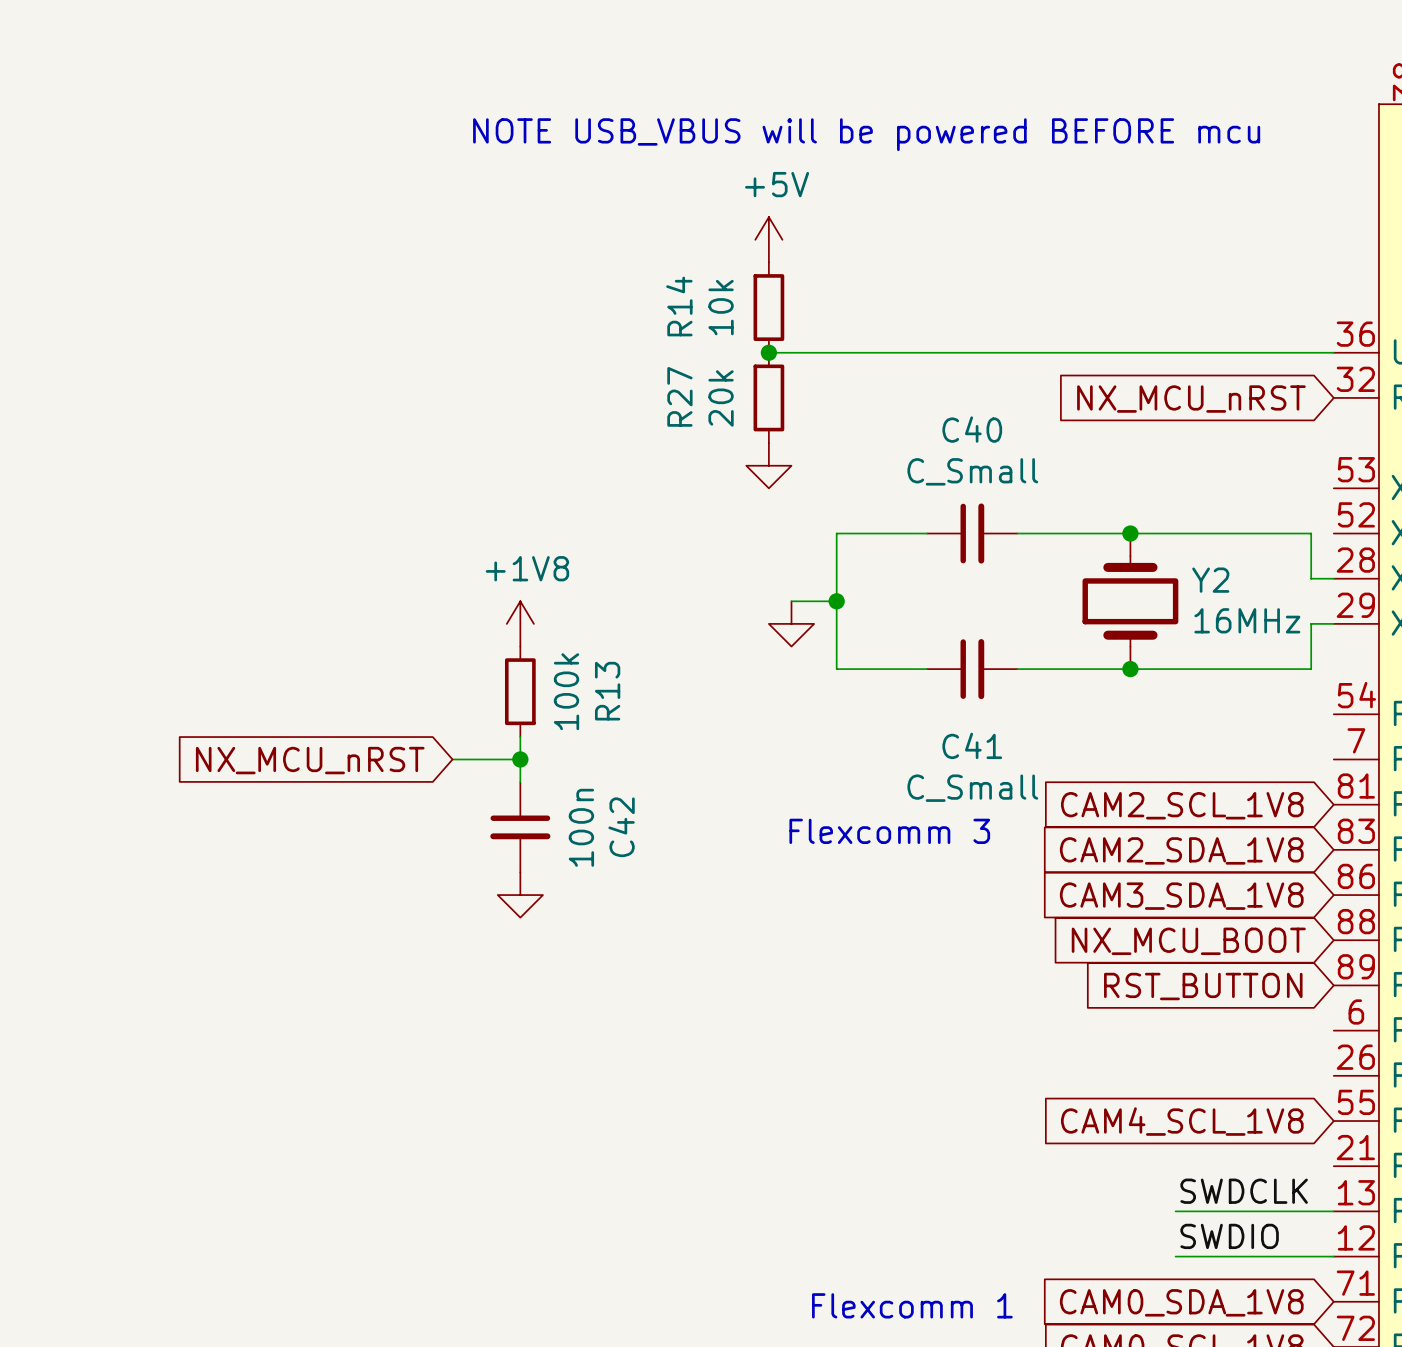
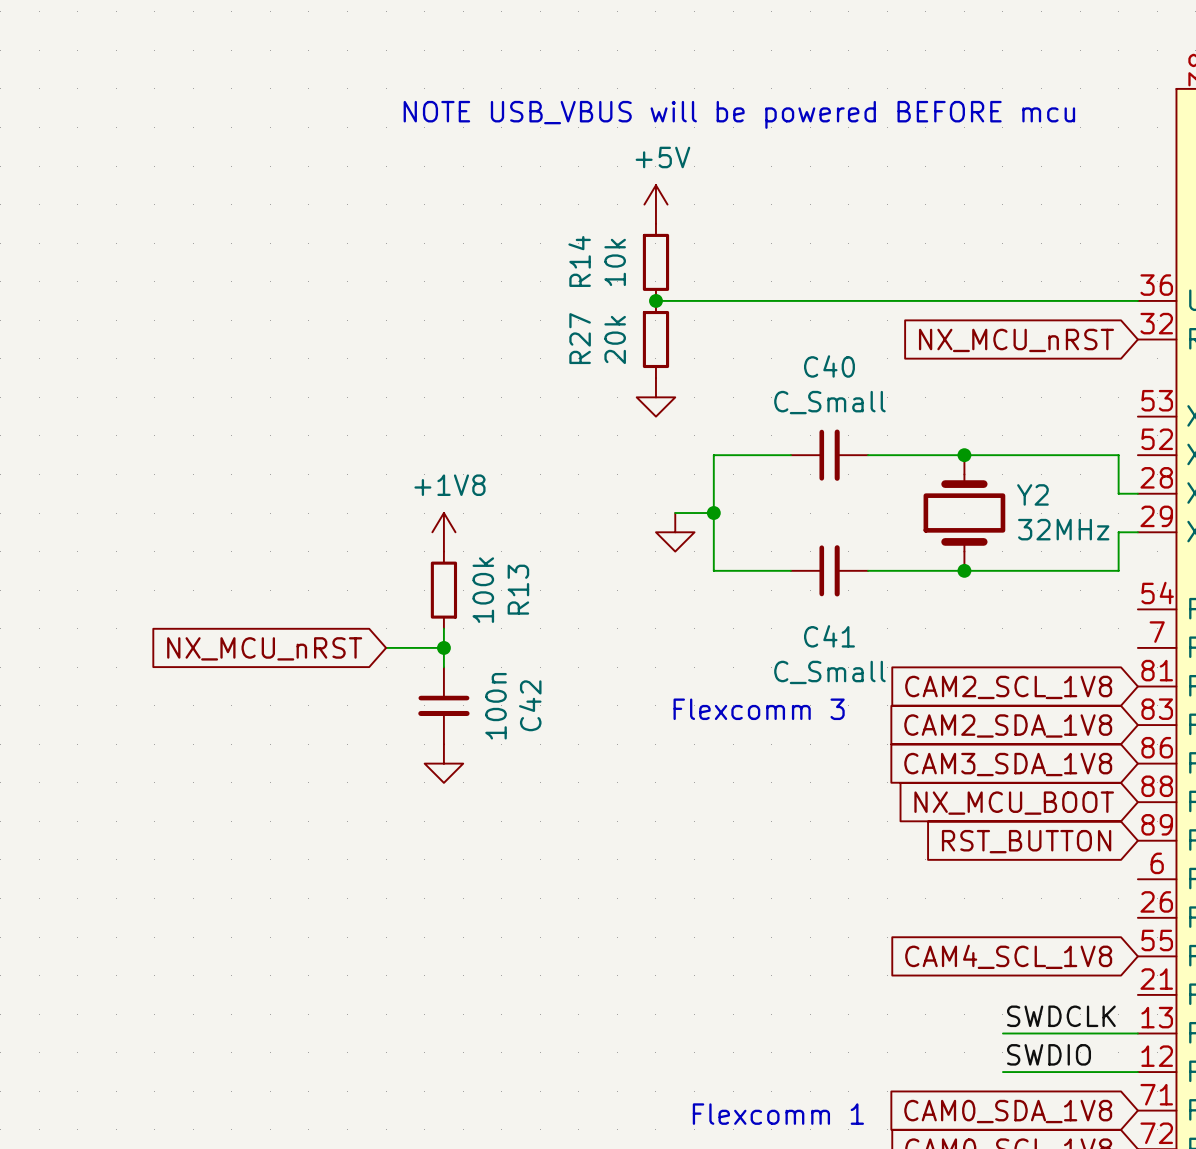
Y2 value: 16MHz (1247, 620) -> 32MHz (1063, 529)

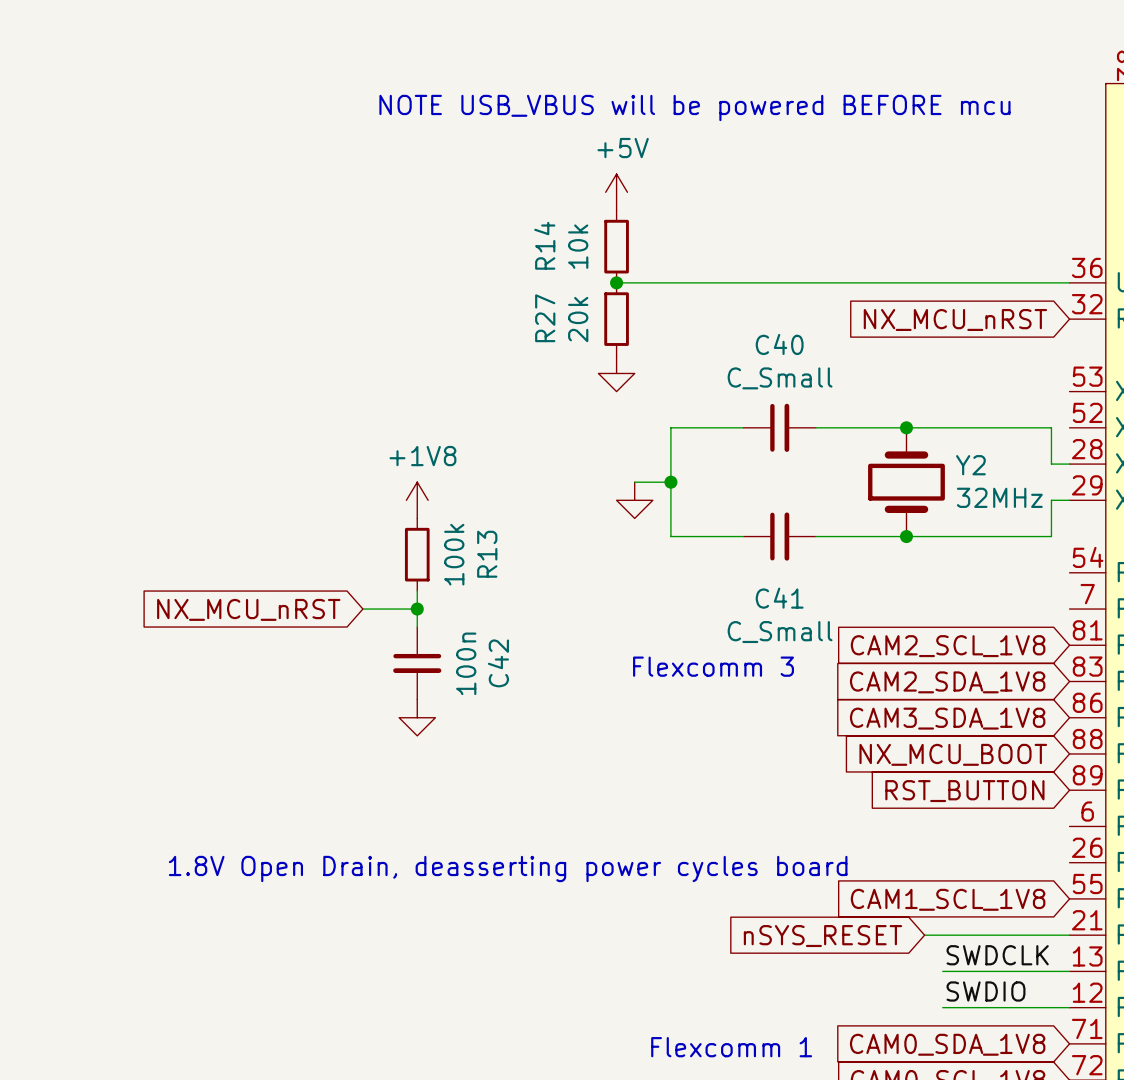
text: none -> 1.8V Open Drain, deasserting power cycles board (508, 868)
global label: CAM4_SCL_1V8 (1008, 956) -> CAM1_SCL_1V8 (948, 899)
wire: none -> (924, 935) (1069, 935)
global label: none -> nSYS_RESET (822, 936)

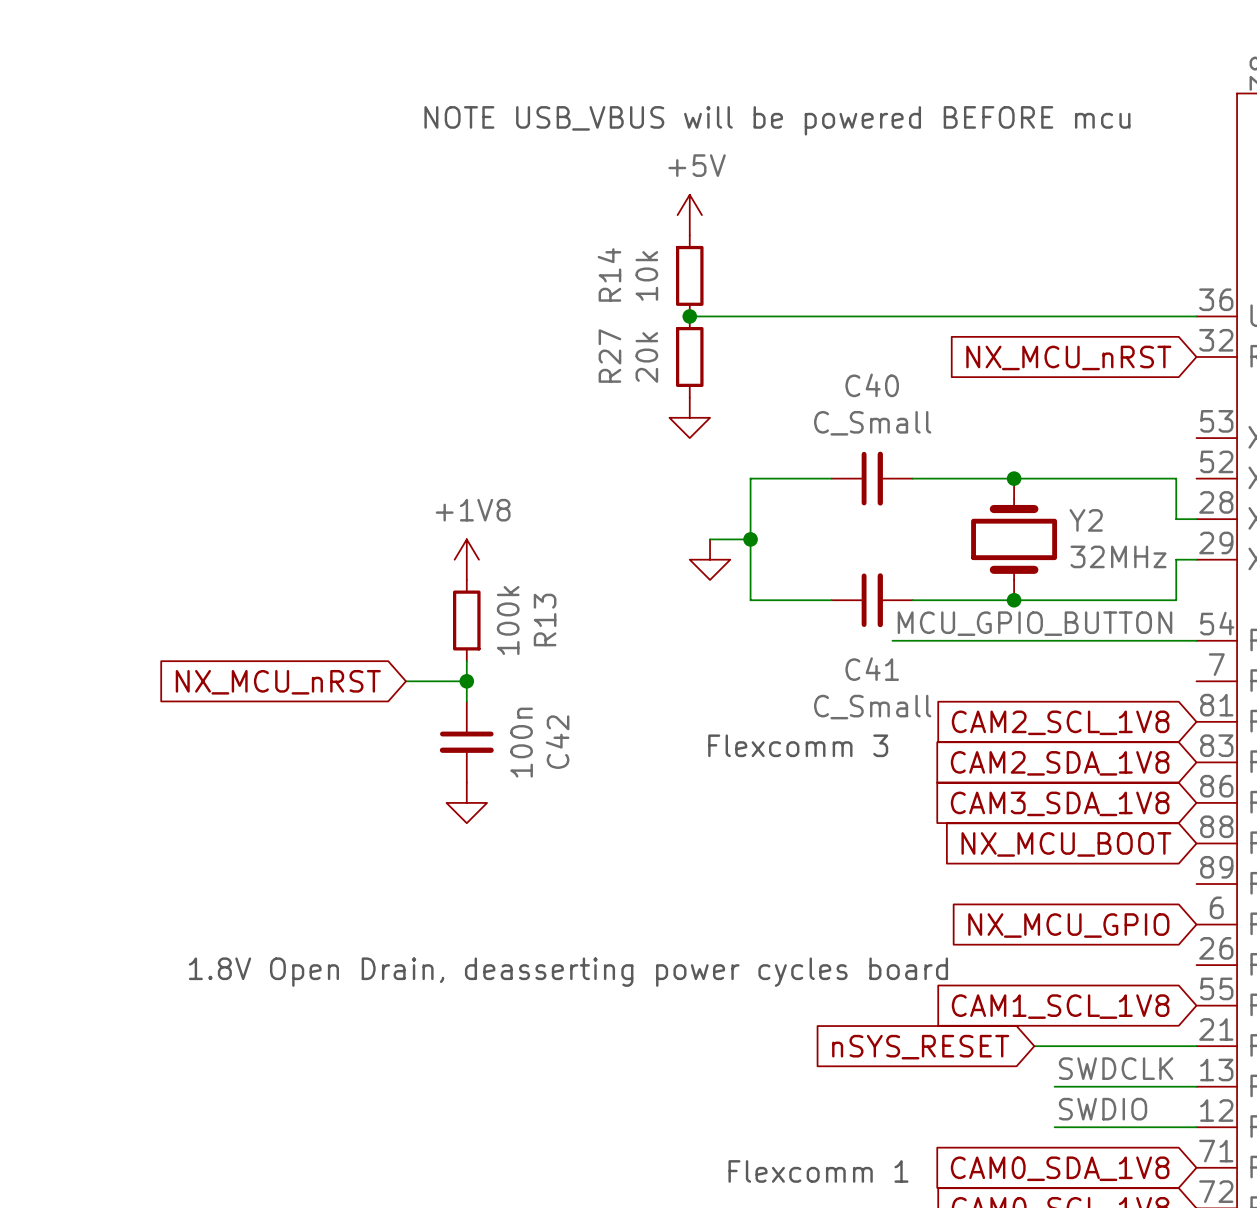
label: none -> MCU_GPIO_BUTTON (1034, 623)
wire: none -> (892, 640) (1196, 640)
global label: RST_BUTTON (964, 791) -> none
global label: none -> NX_MCU_GPIO (1068, 925)

